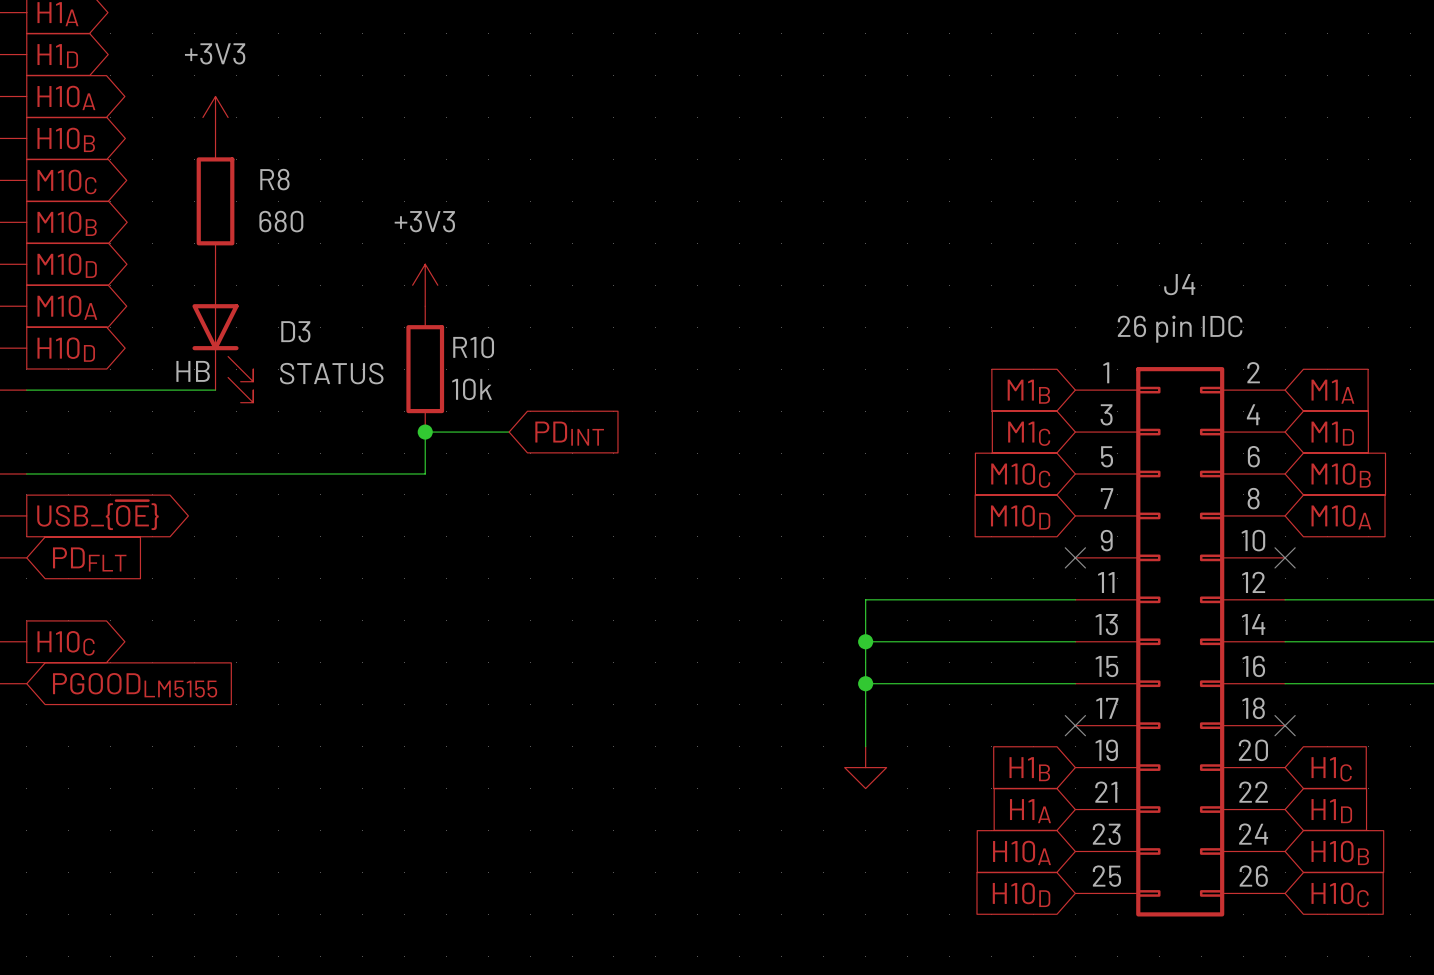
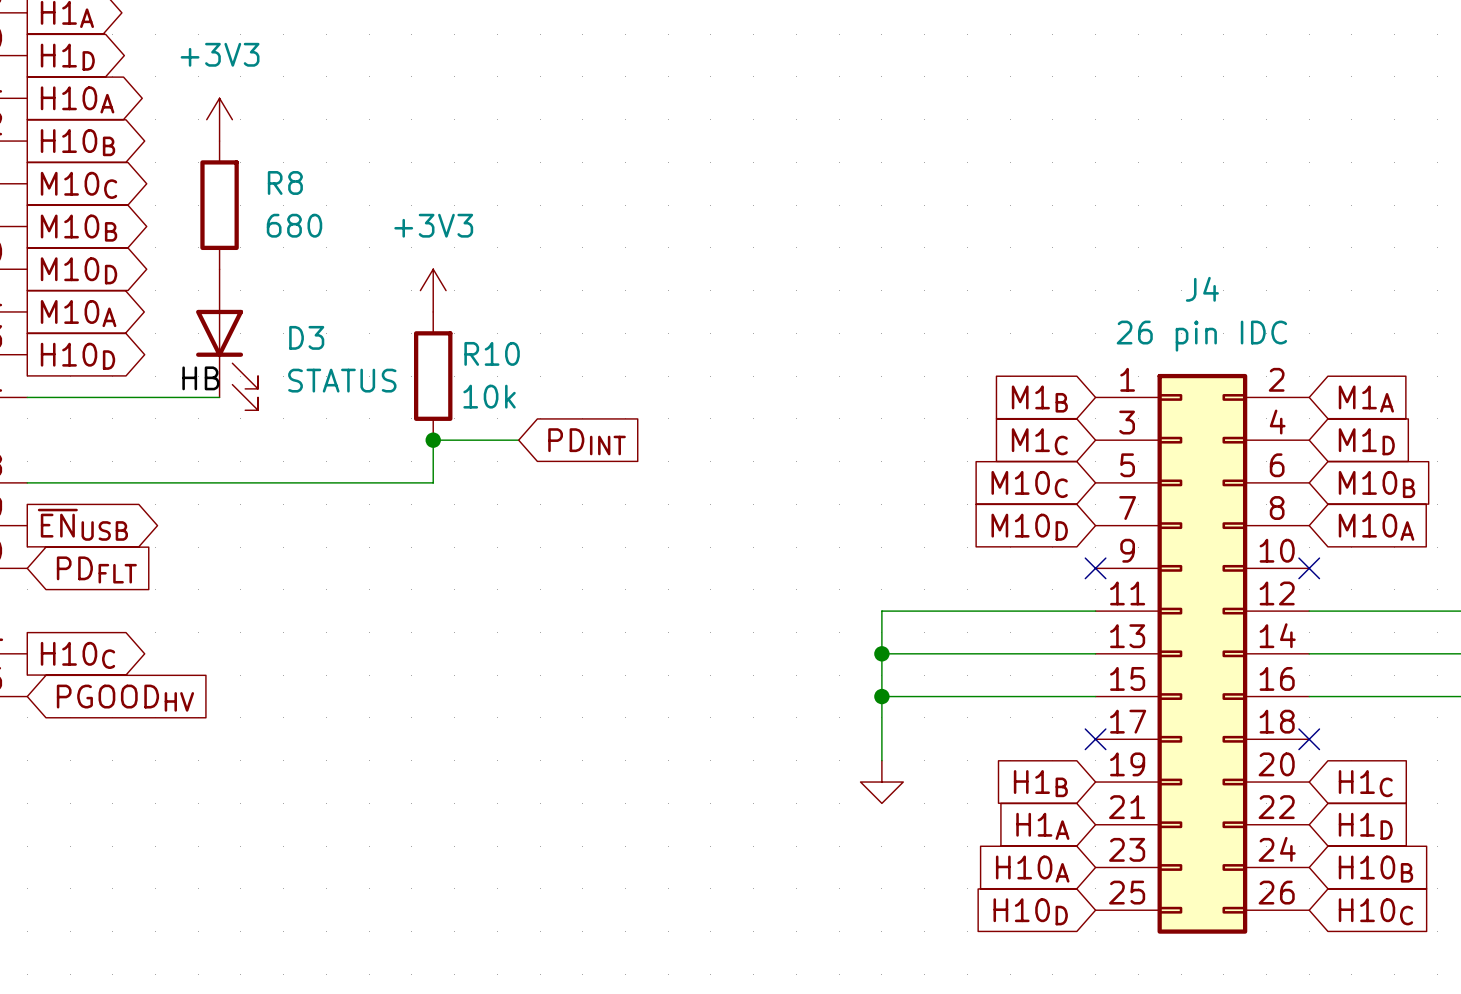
global label: USB_{~{OE}} (97, 515) -> ~{EN}USB (82, 524)
global label: PGOODLM5155 (135, 685) -> PGOODHV (125, 698)

